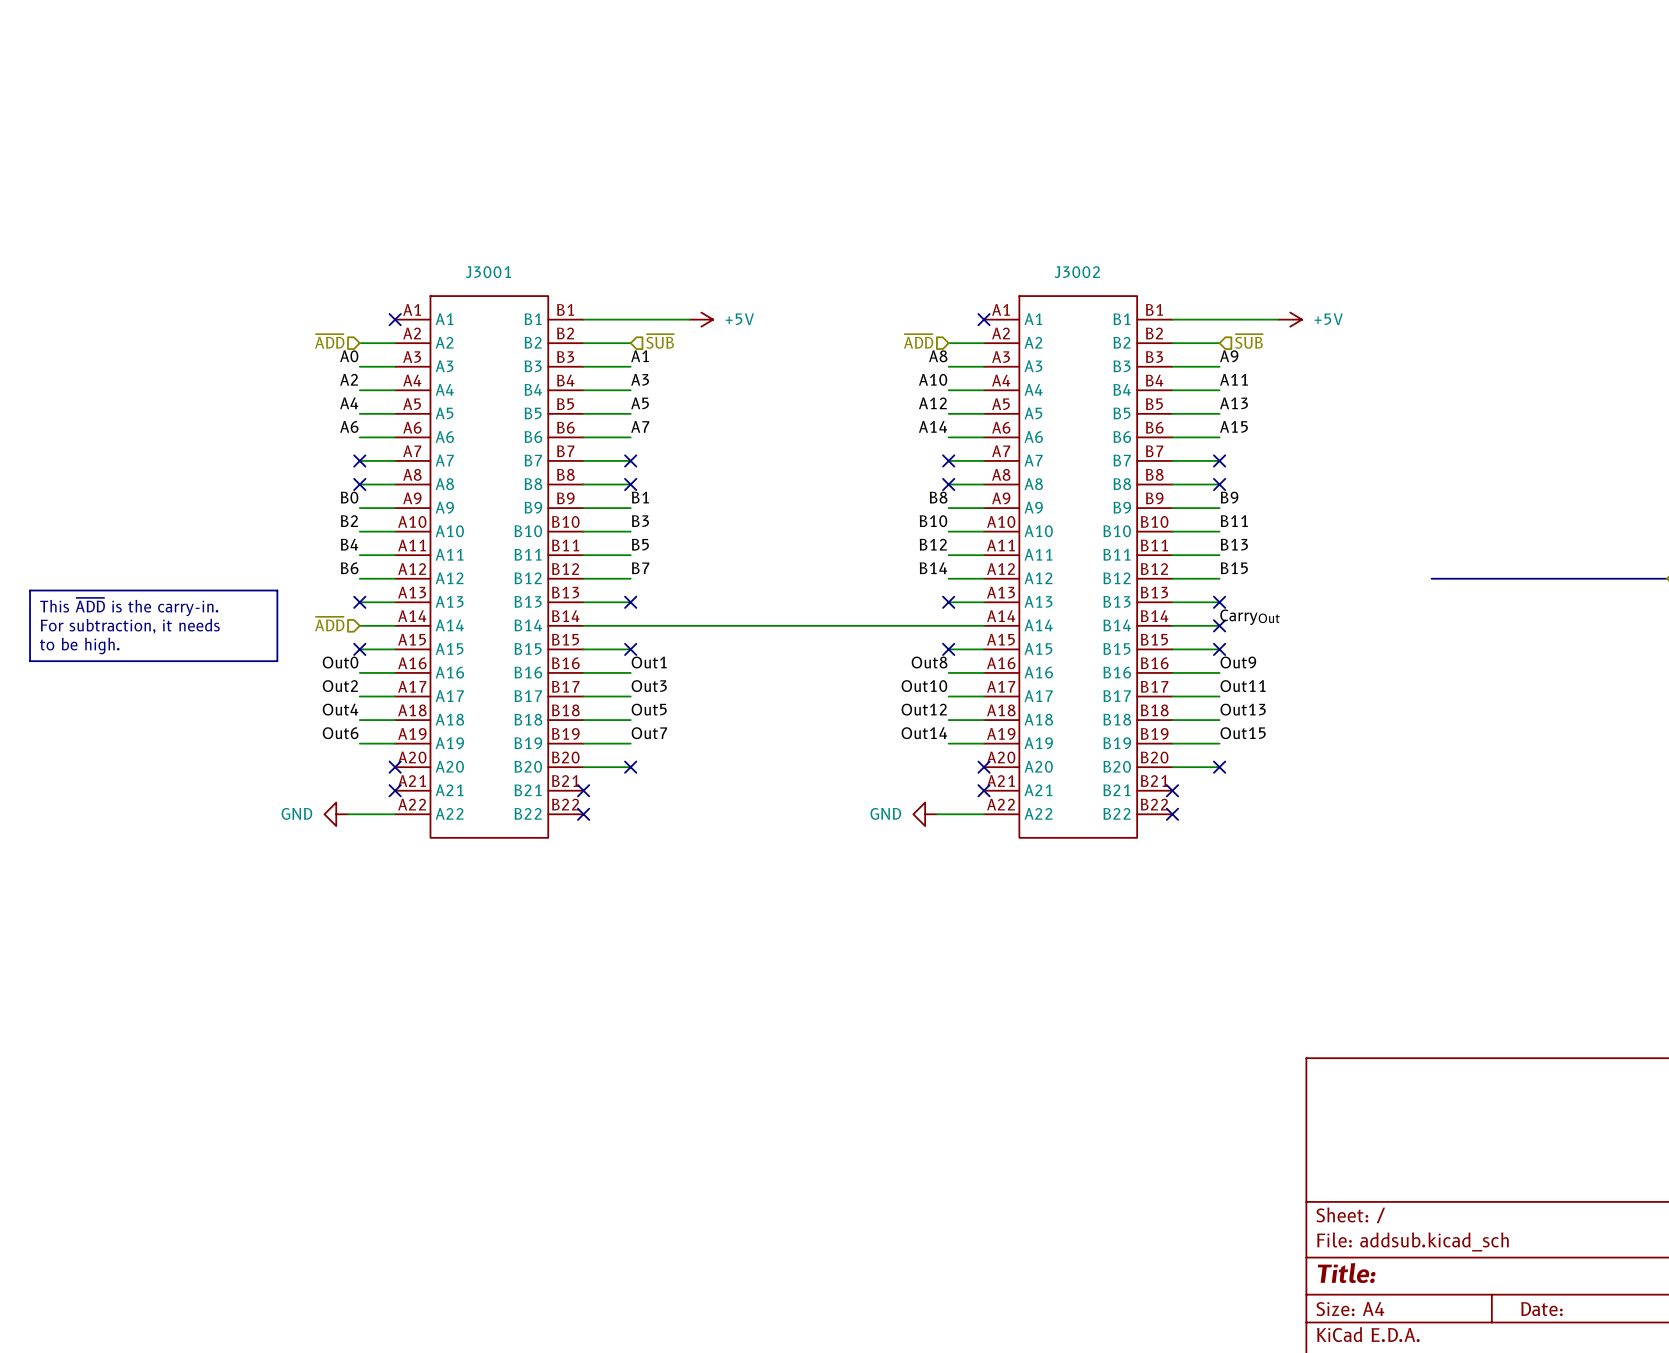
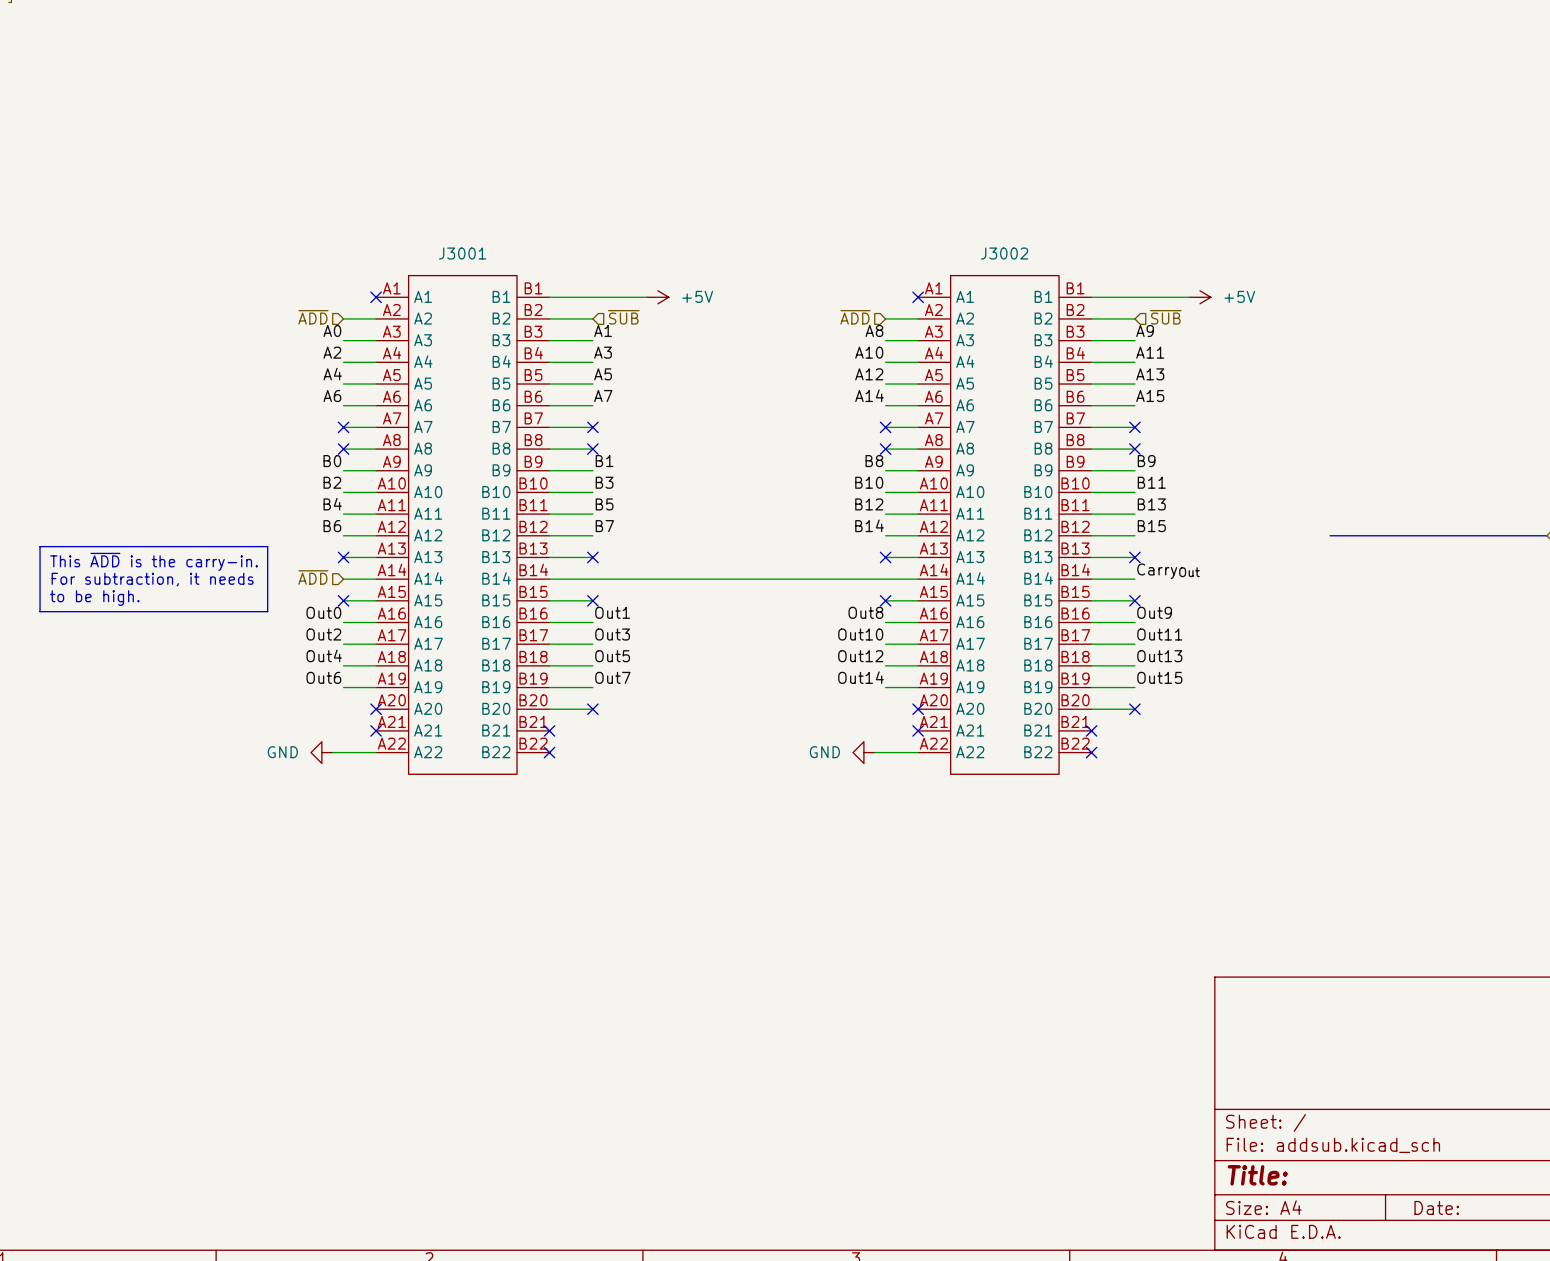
no-connect mark: (1219, 625) -> none

